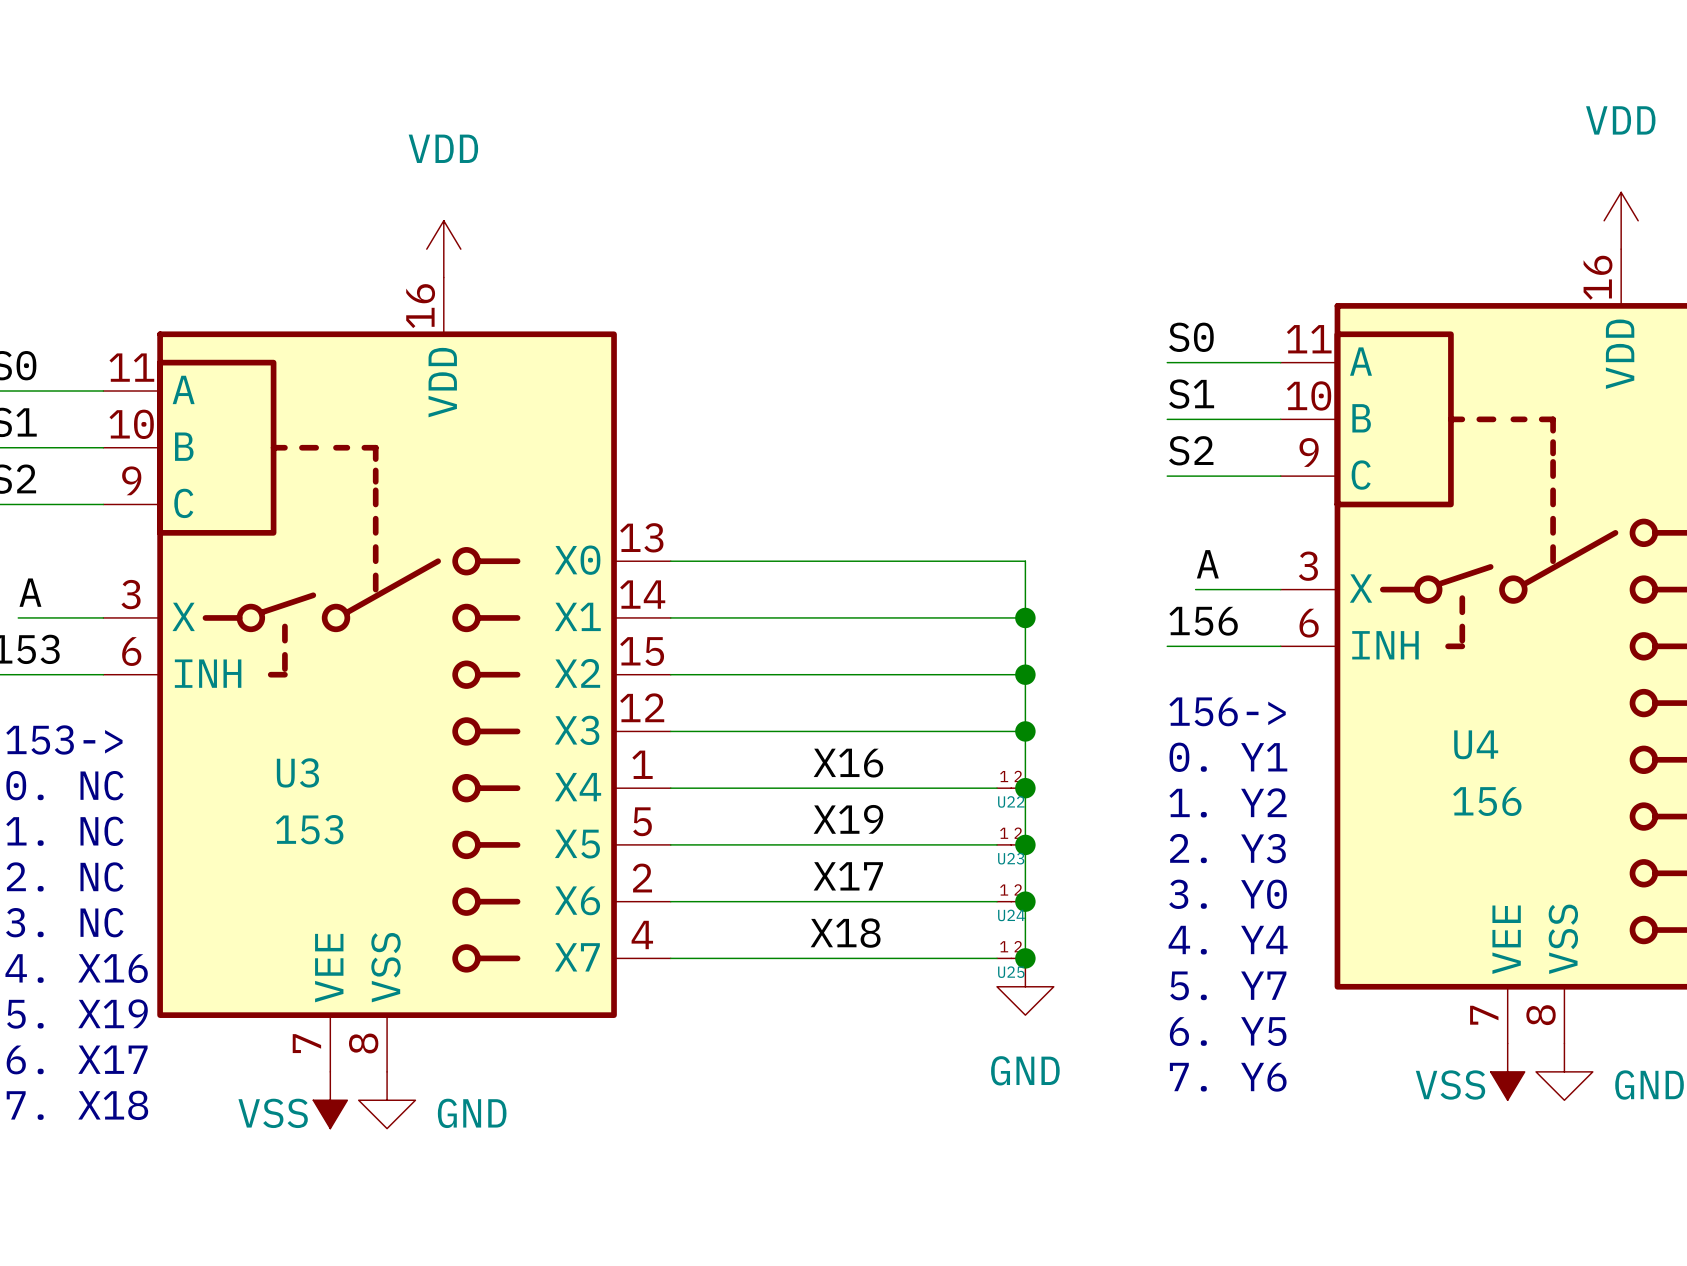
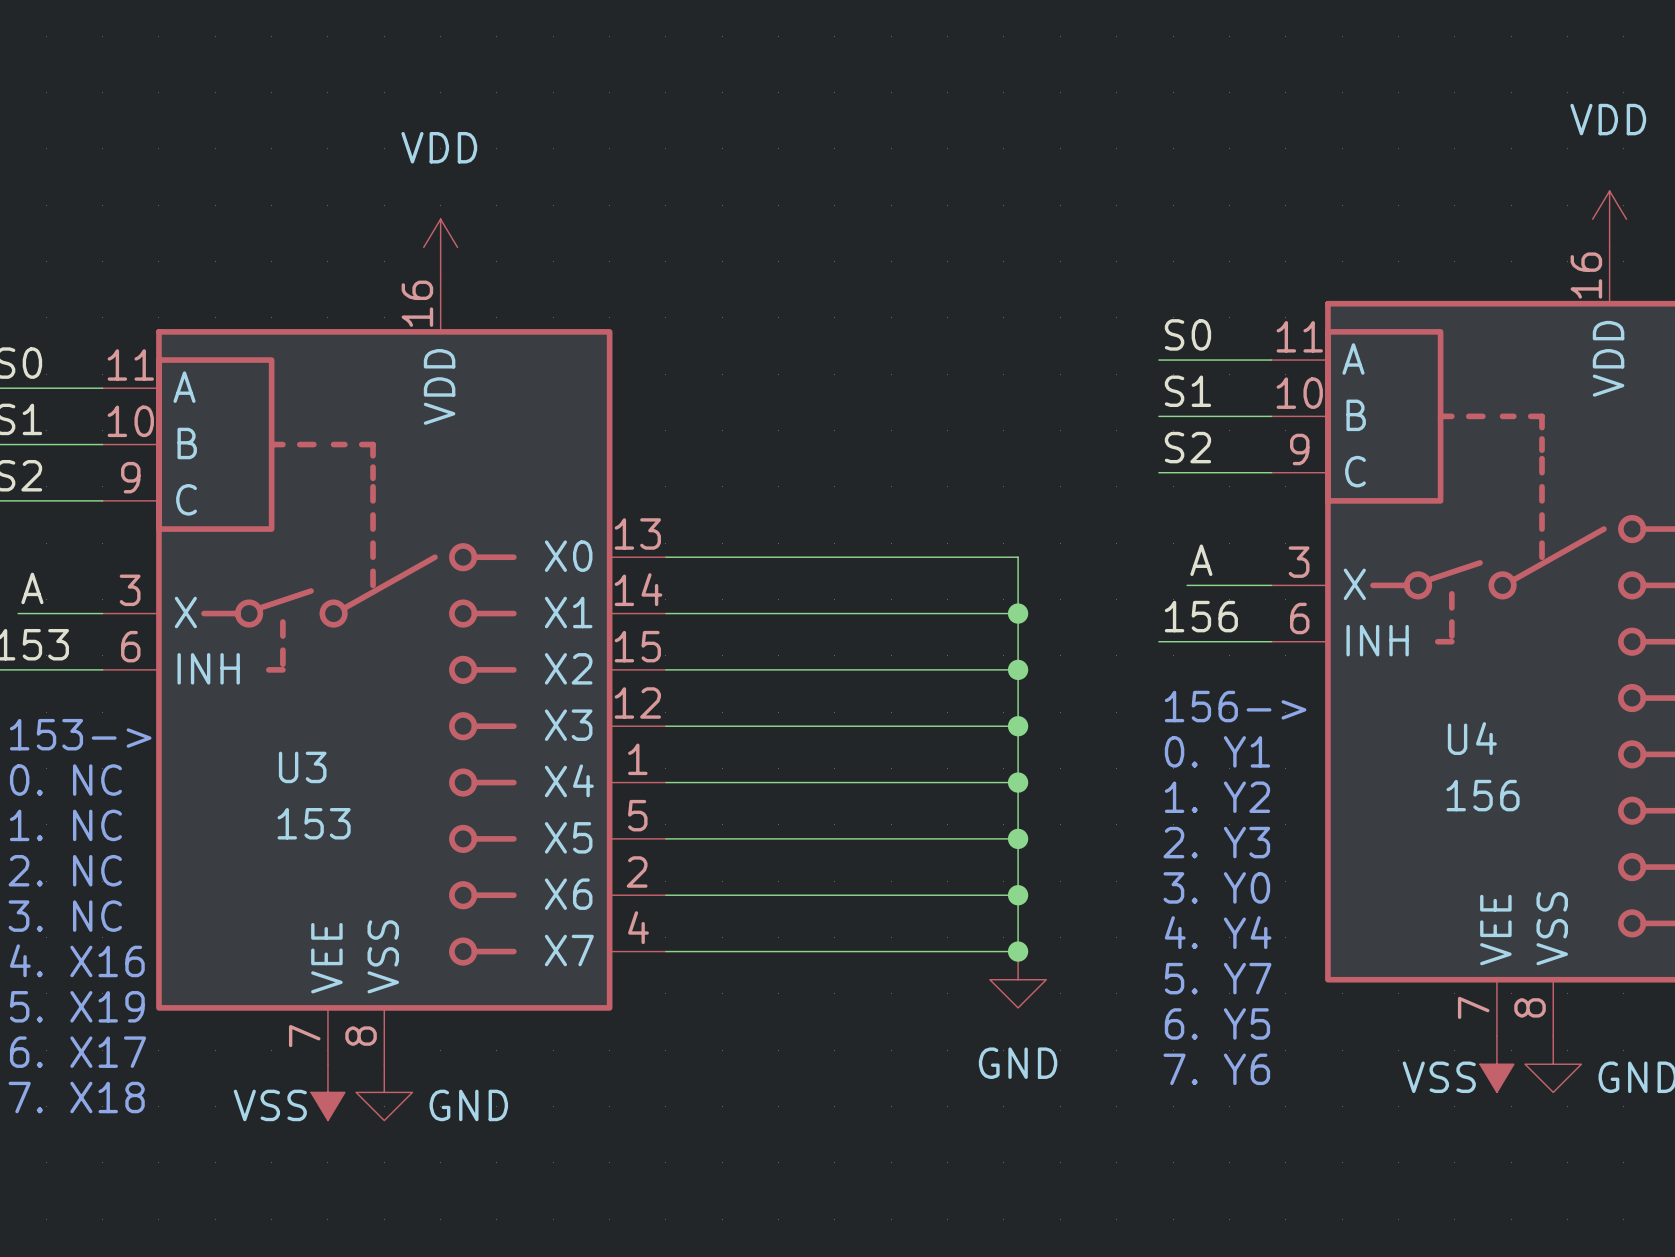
label: X16 (848, 763) -> none
U22: (1011, 788) -> none
label: X19 (848, 819) -> none
U23: (1011, 844) -> none
label: X17 (848, 876) -> none
U24: (1011, 901) -> none
label: X18 (845, 933) -> none
U25: (1011, 958) -> none

